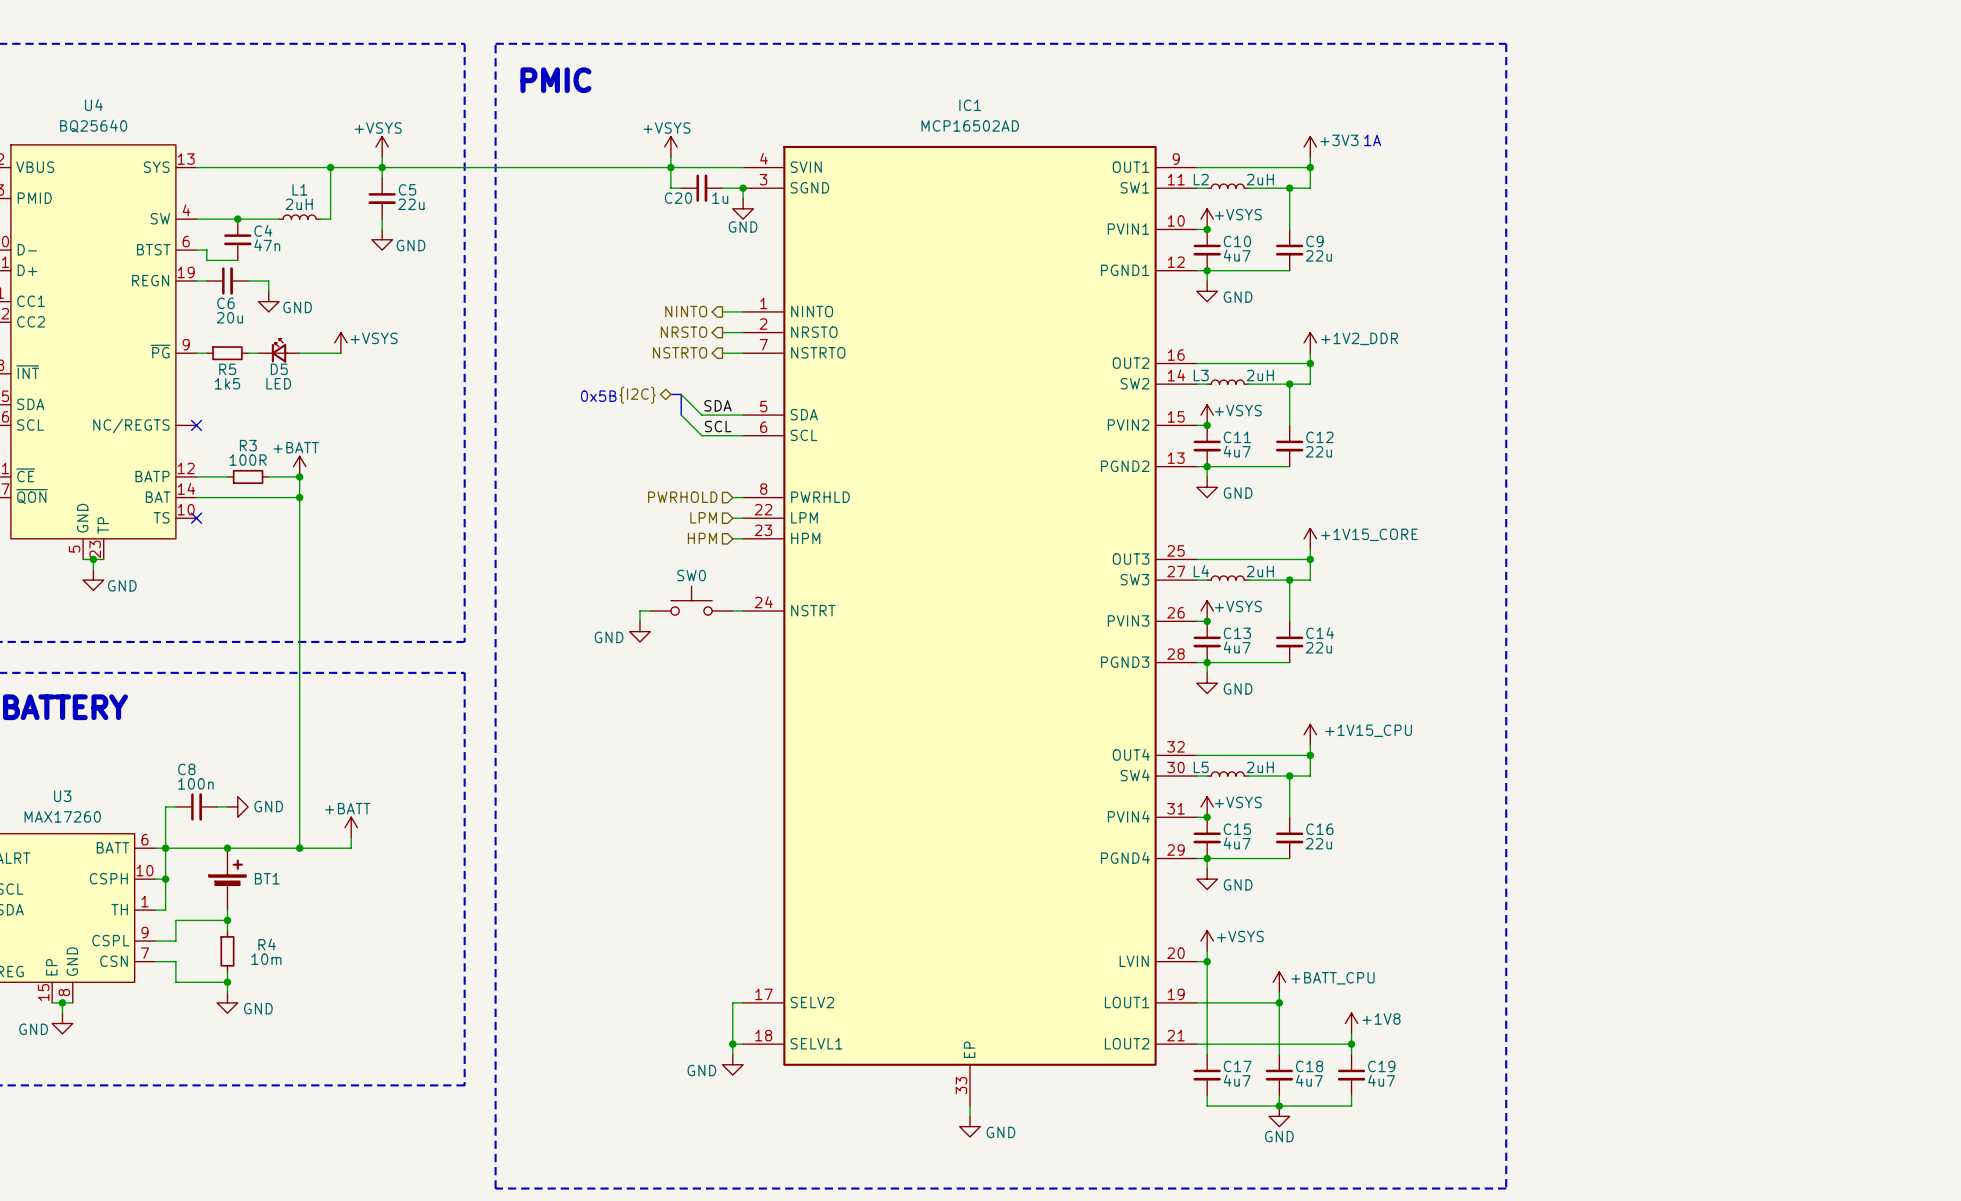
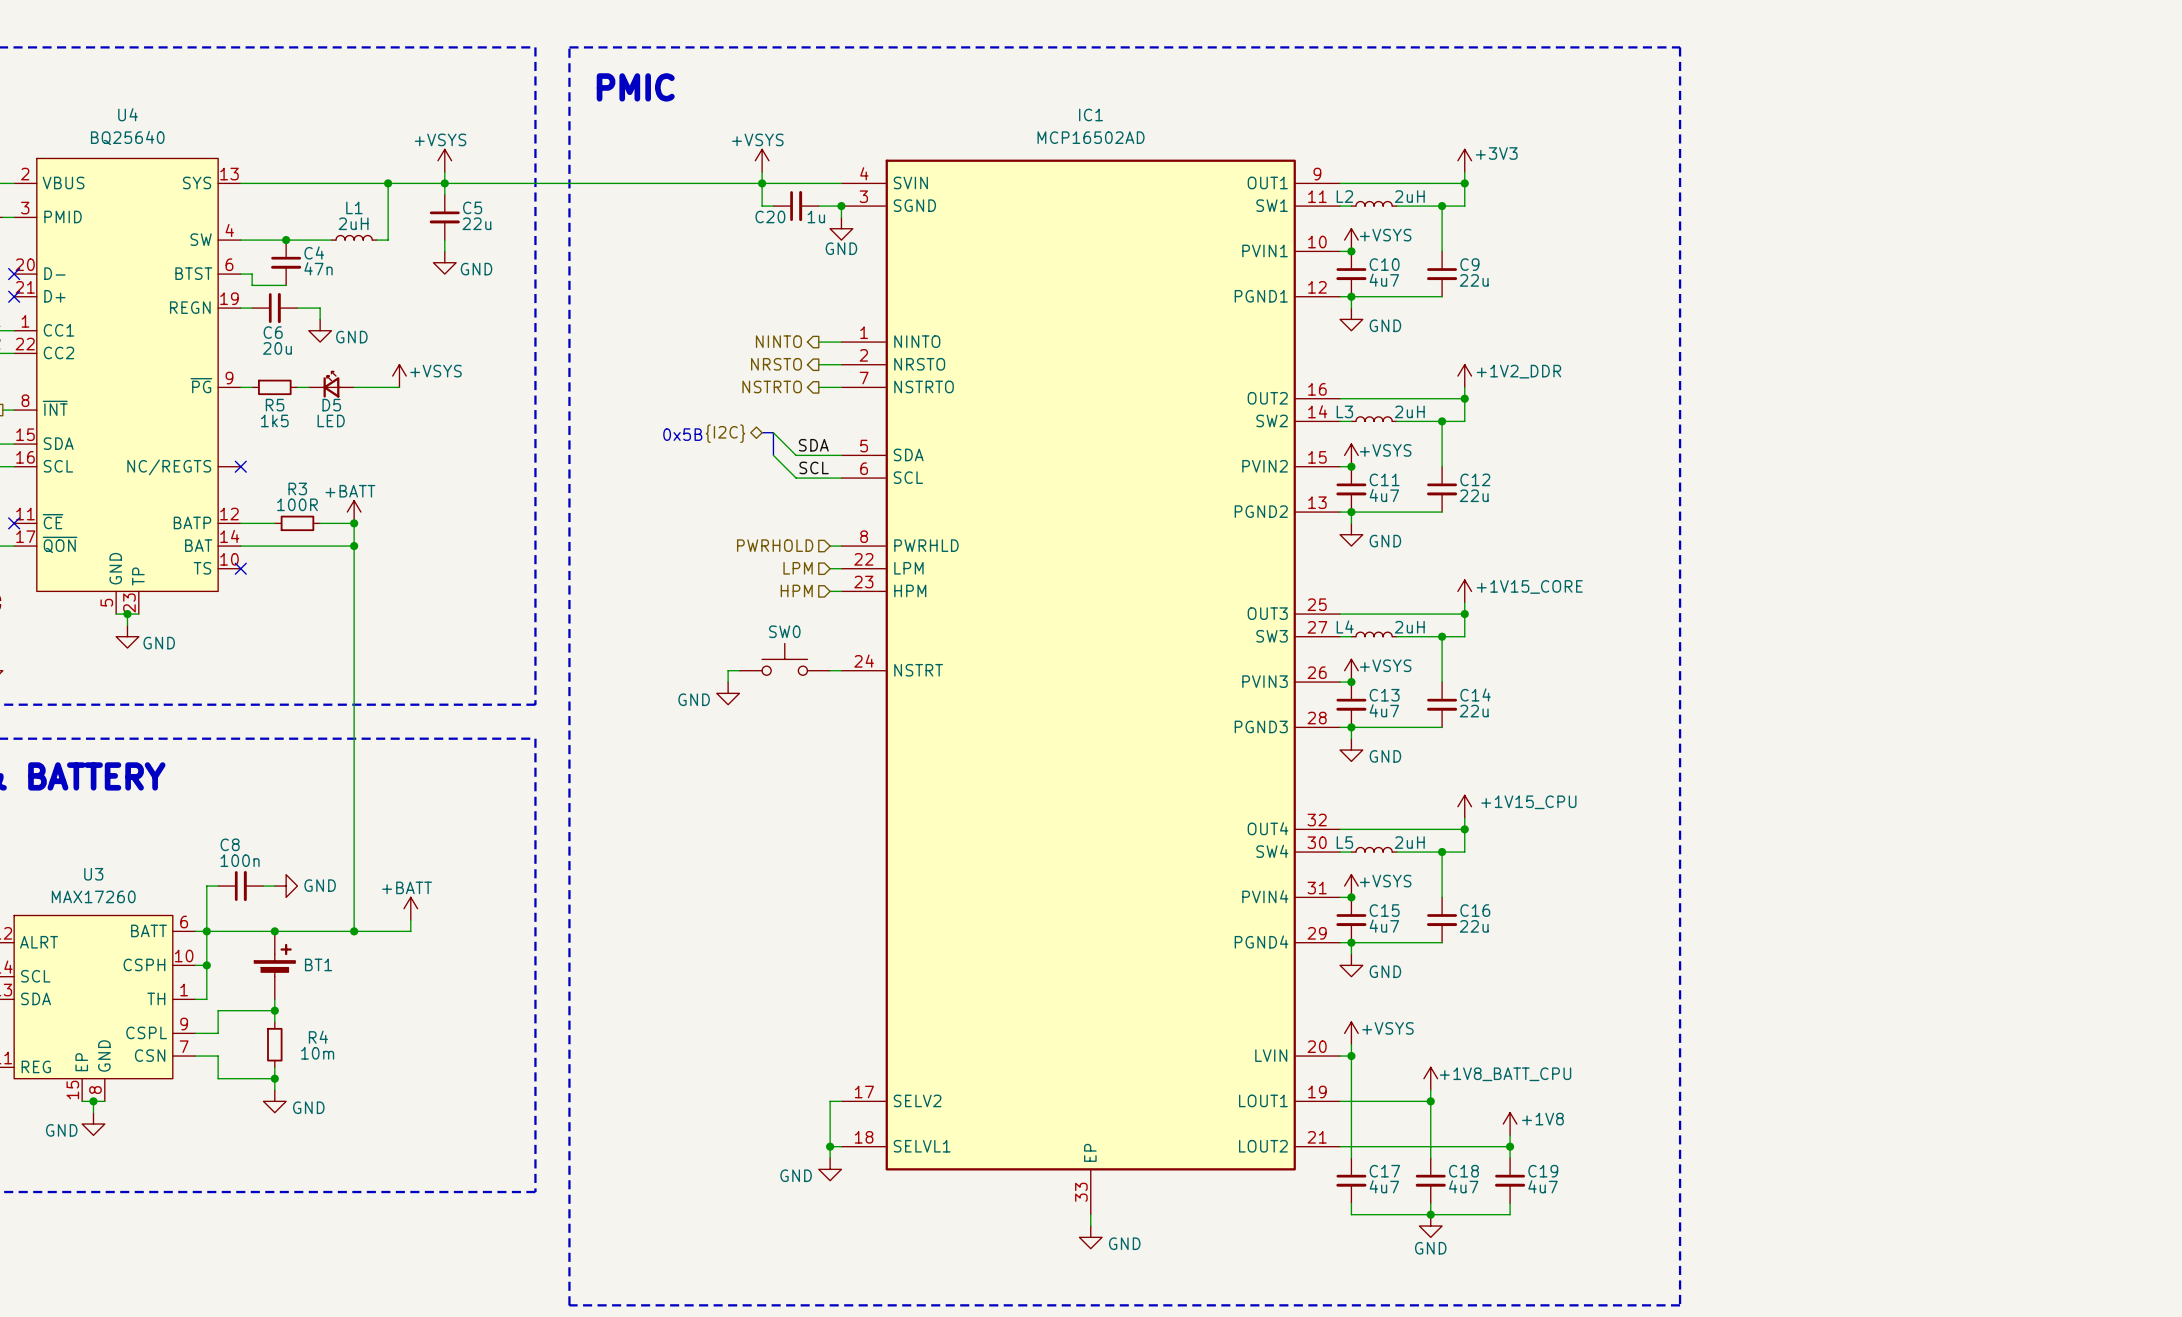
text: 1A (1372, 140) -> none
power symbol: +BATT_CPU (1279, 982) -> +1V8_BATT_CPU (1430, 1078)

